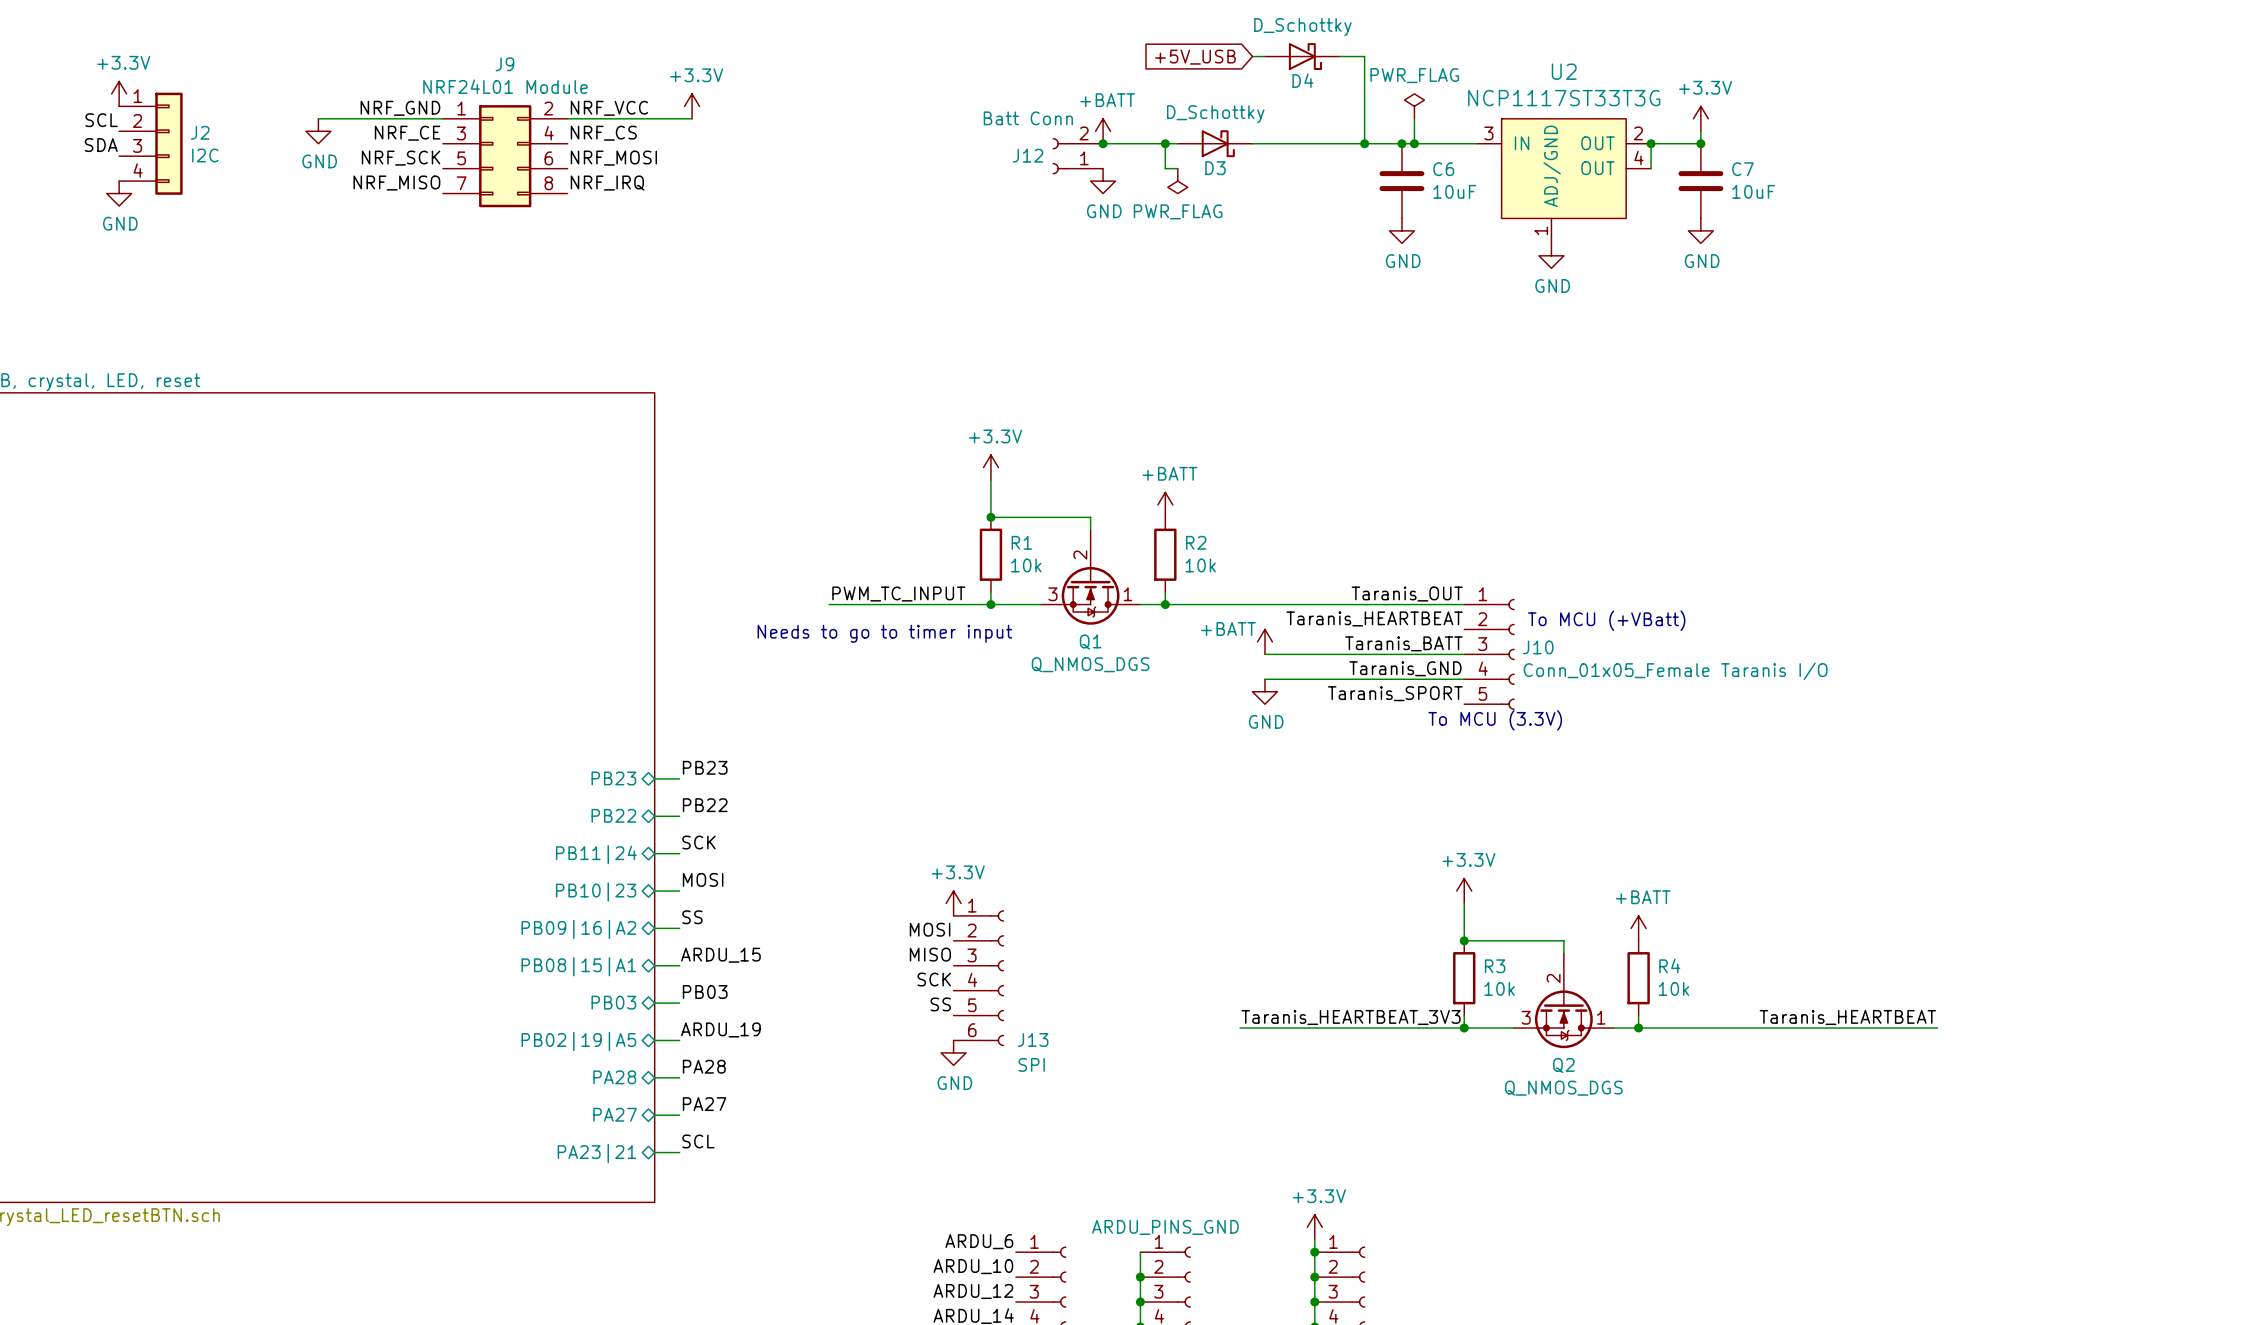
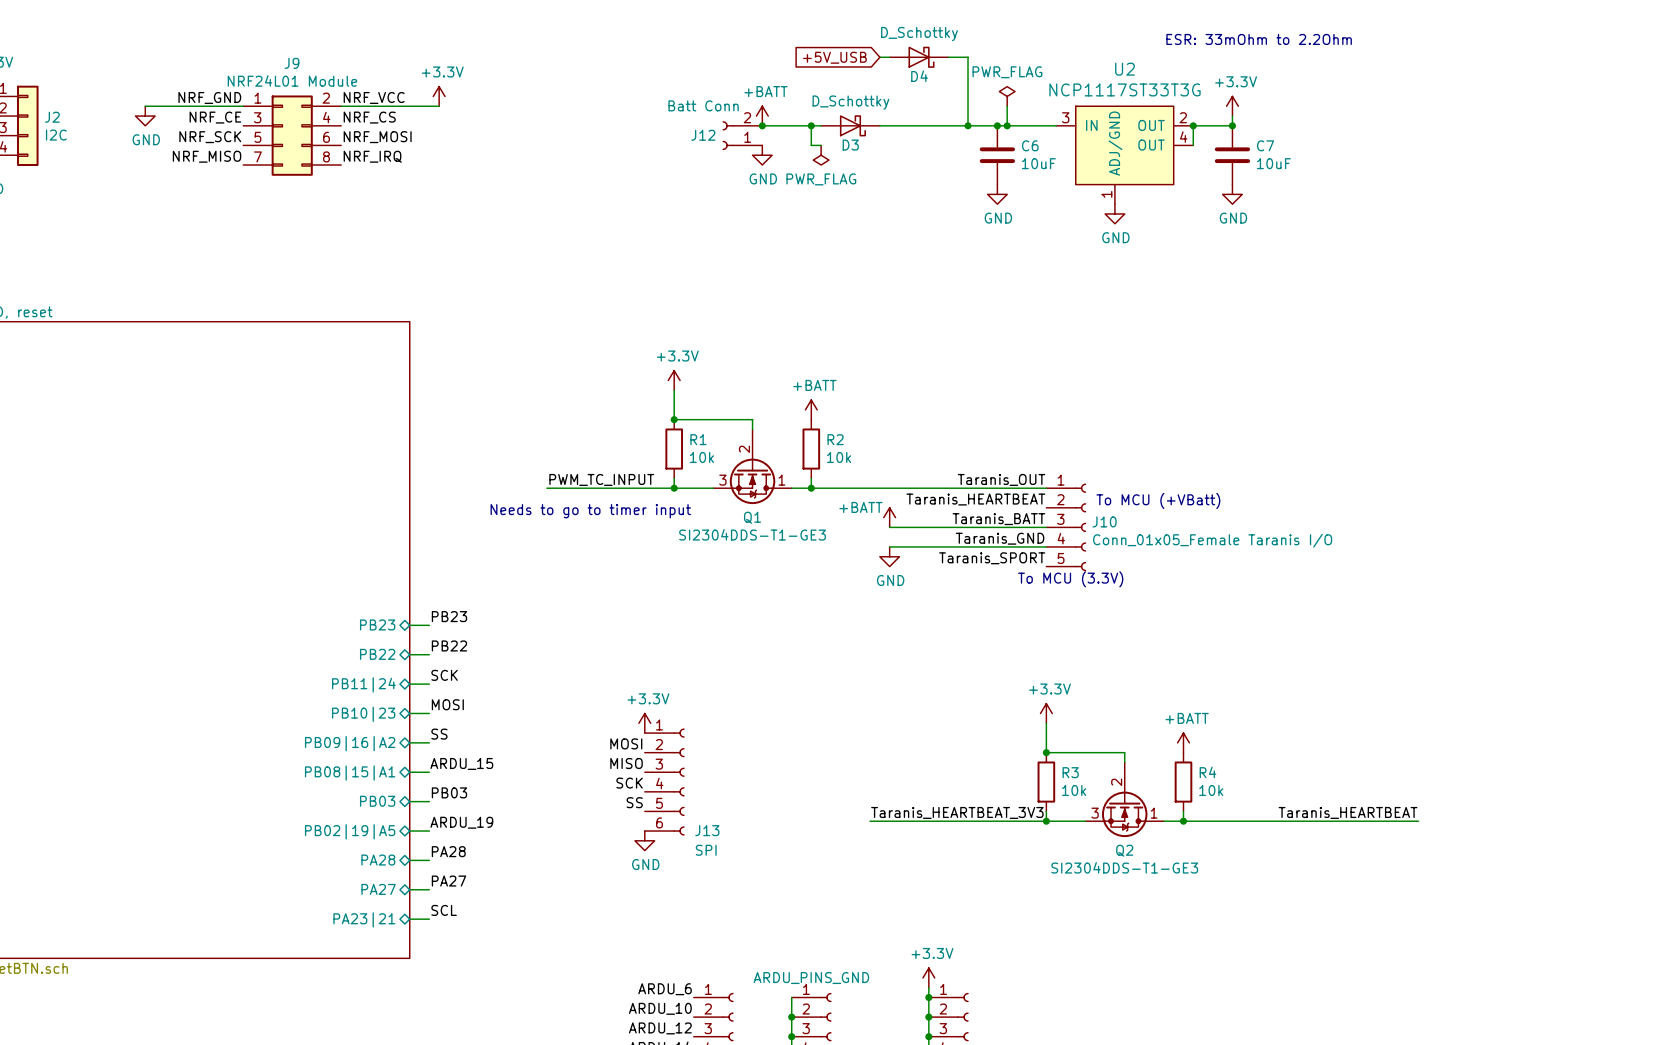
text: none -> ESR: 33mOhm to 2.2Ohm (1259, 39)
Q1 value: Q_NMOS_DGS (1090, 664) -> SI2304DDS-T1-GE3 (752, 534)
Q2 value: Q_NMOS_DGS (1563, 1088) -> SI2304DDS-T1-GE3 (1124, 867)

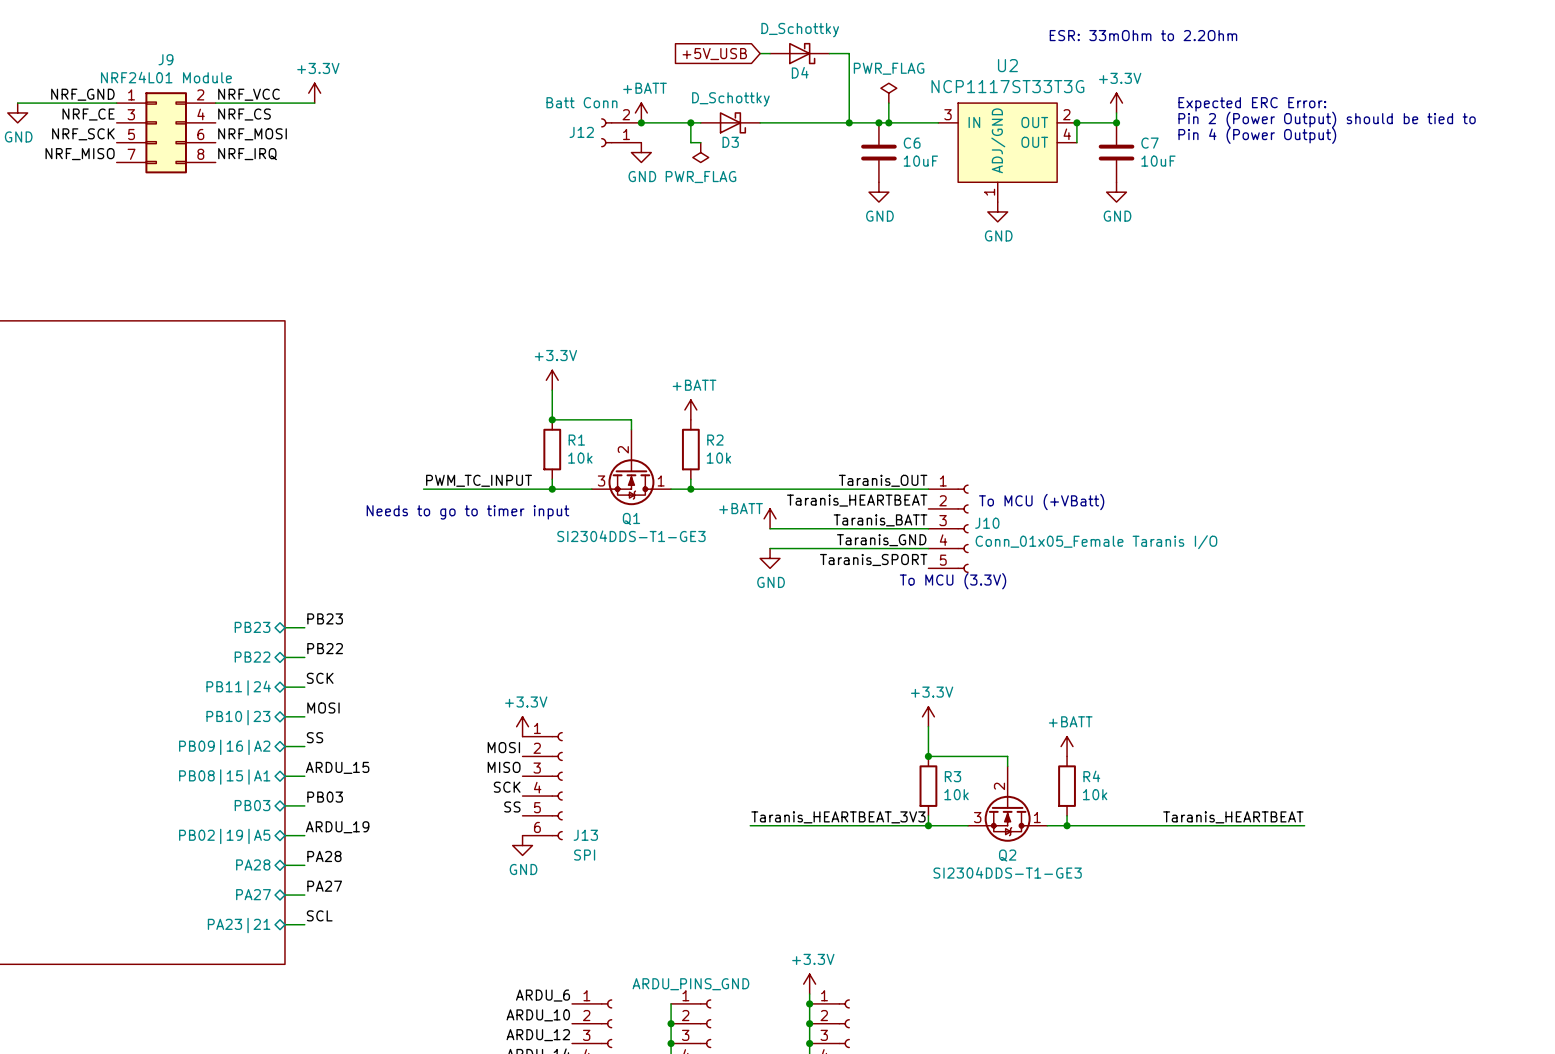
text: none -> Expected ERC Error: (1252, 104)
text: none -> Pin 2 (Power Output) should be tied to (1327, 119)
text: none -> Pin 4 (Power Output) (1257, 135)

